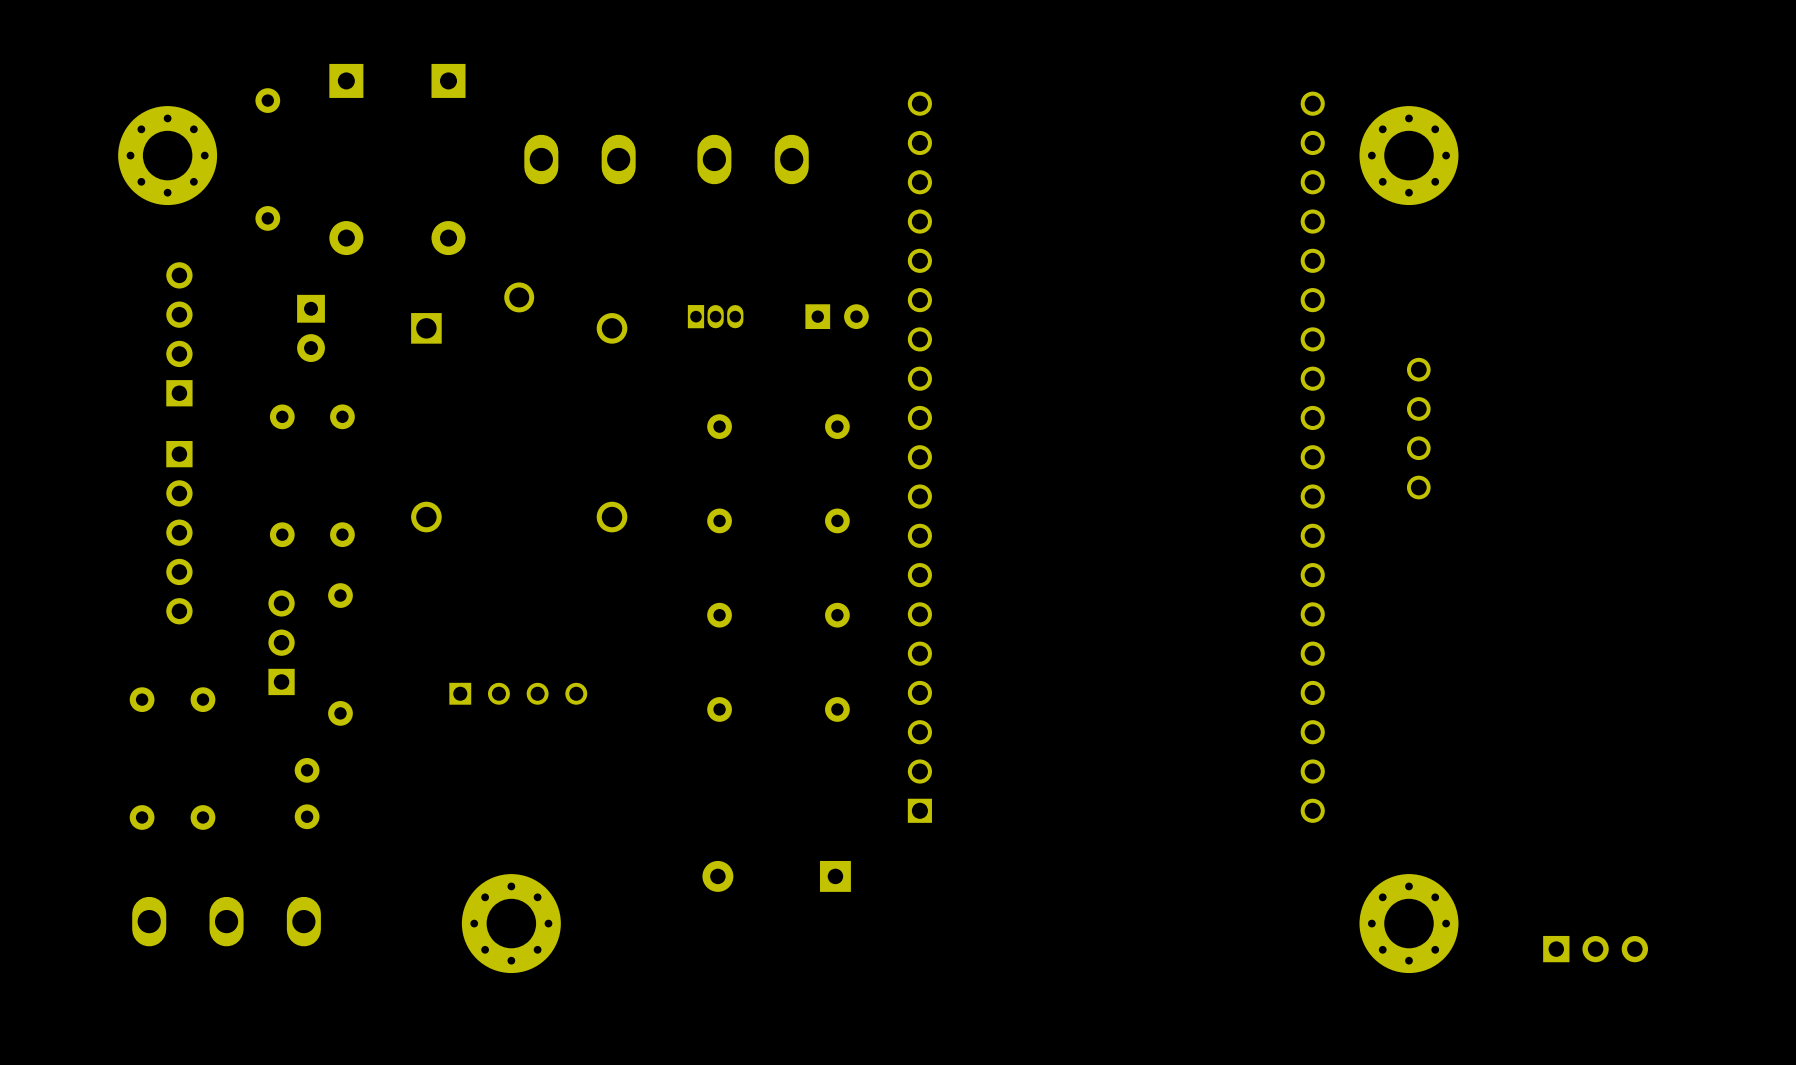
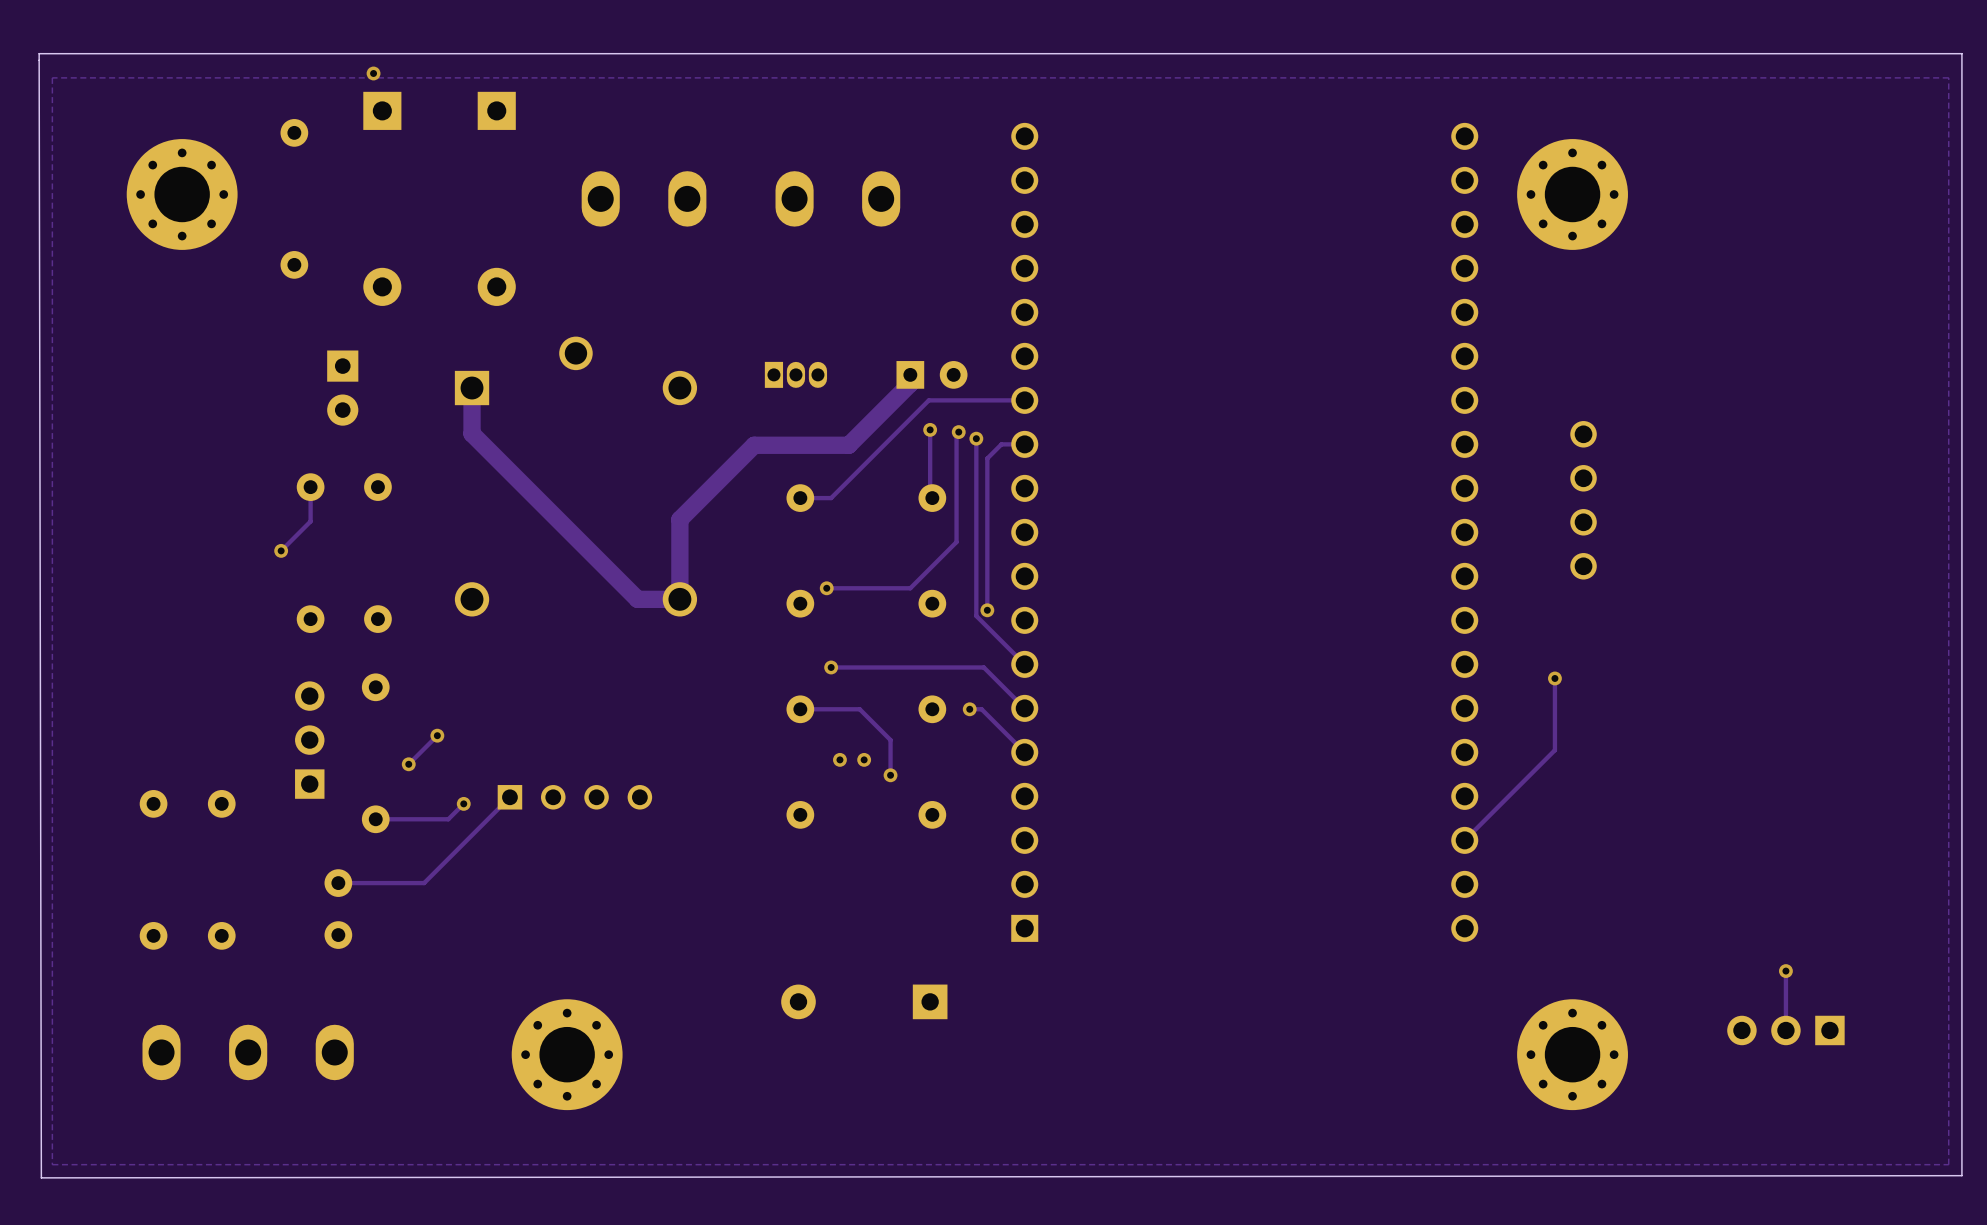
board edge: none -> (1961, 53) (39, 53) (41, 1177) (1961, 1175) (1961, 53)
via: none -> (373, 73)
zone outline: none -> (1948, 77) (1948, 1164) (52, 1164) (52, 77) (1948, 77)
track: none -> (910, 374) (910, 383) (848, 445) (754, 445) (679, 519) (679, 599) (637, 599) (472, 433) (472, 388)
part: (179, 334) -> none
track: none -> (1024, 400) (928, 400) (831, 498) (800, 498)
track: none -> (930, 429) (930, 495) (932, 498)
via: none -> (930, 429)
track: none -> (958, 432) (956, 434) (956, 542) (910, 588) (826, 588)
via: none -> (958, 432)
track: none -> (976, 438) (976, 615) (1024, 664)
via: none -> (976, 438)
track: none -> (1024, 444) (1001, 444) (987, 458) (987, 610)
track: none -> (310, 487) (310, 521) (281, 550)
via: none -> (281, 550)
via: none -> (826, 588)
via: none -> (987, 610)
part: (179, 532) -> none
track: none -> (831, 667) (983, 667) (1024, 708)
via: none -> (831, 667)
track: none -> (1554, 678) (1554, 750) (1464, 840)
via: none -> (1554, 678)
track: none -> (800, 709) (859, 709) (890, 740) (890, 775)
track: none -> (969, 709) (981, 709) (1024, 752)
via: none -> (969, 709)
track: none -> (437, 735) (408, 764)
via: none -> (437, 735)
via: none -> (839, 759)
via: none -> (864, 759)
via: none -> (408, 764)
via: none -> (890, 775)
track: none -> (509, 797) (424, 883) (338, 883)
track: none -> (463, 803) (448, 819) (375, 819)
via: none -> (463, 803)
track: none -> (1785, 971) (1785, 1030)
via: none -> (1785, 971)
part rotation: 0° (1595, 949) -> 180° (1785, 1030)

